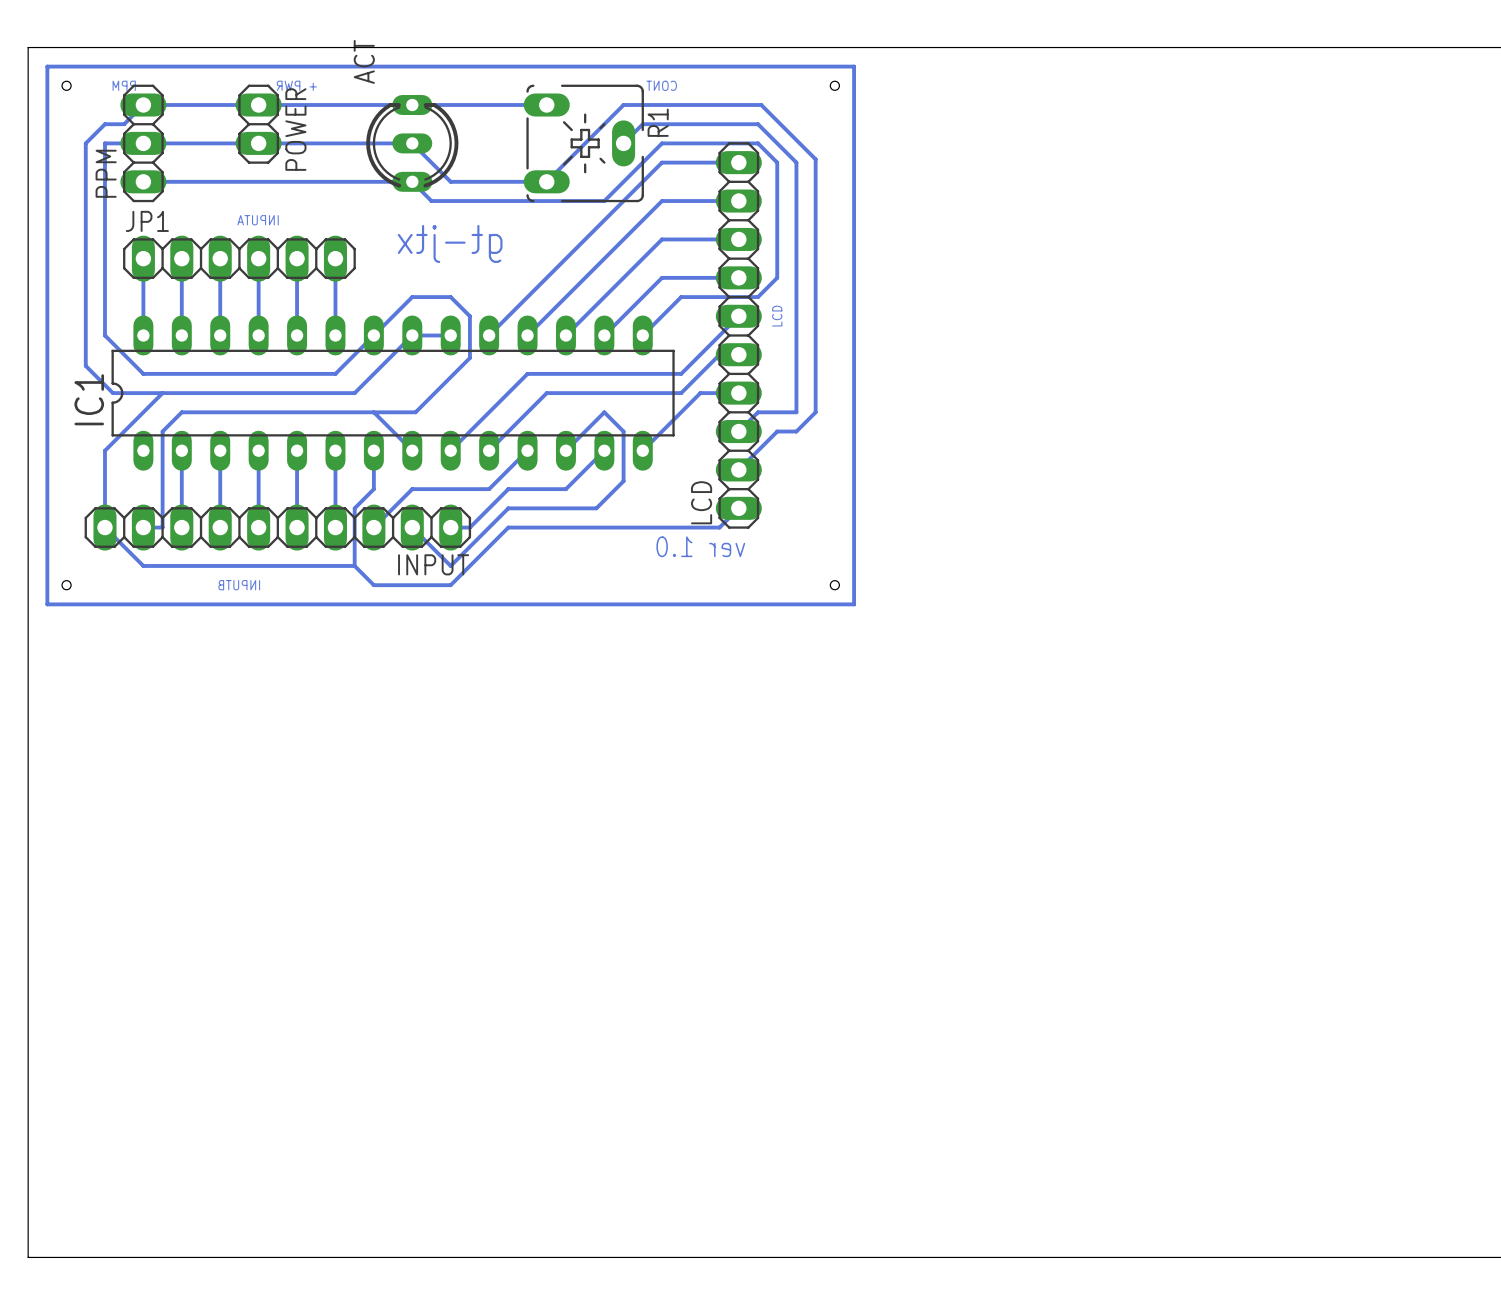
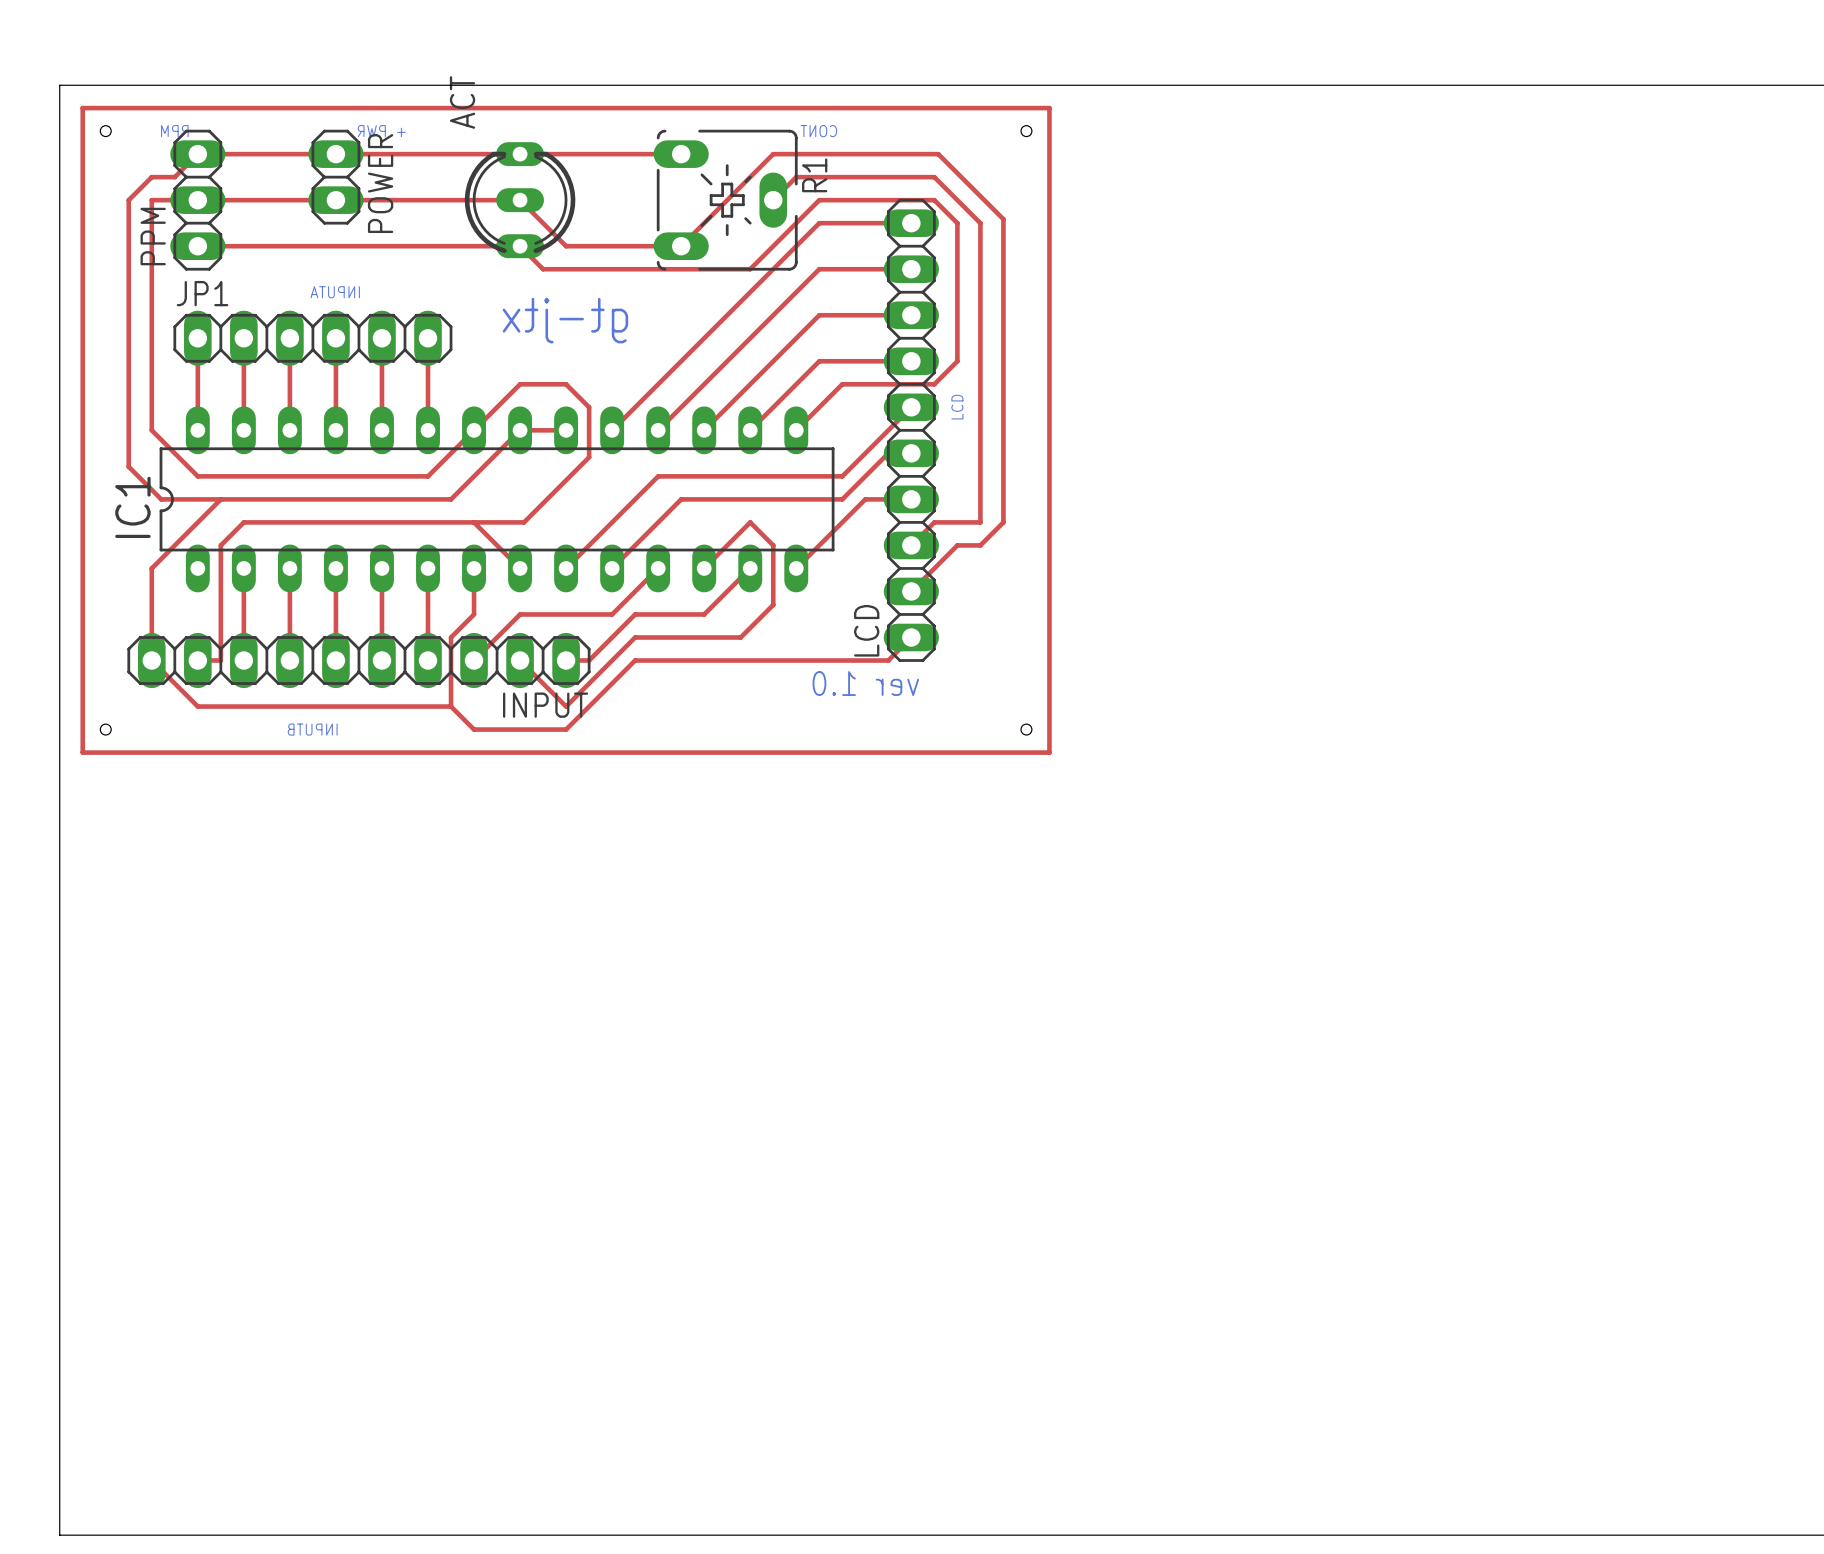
bottom track: (47, 66) (47, 604) (854, 604) (854, 66) (47, 66) -> none
top track: none -> (82, 108) (82, 752) (1049, 752) (1049, 108) (82, 108)
bottom track: (546, 105) (143, 105) (124, 124) (104, 124) (85, 143) (85, 365) (112, 393) (354, 393) (412, 335) (450, 335) -> none
top track: none -> (681, 154) (197, 154) (174, 177) (151, 177) (128, 200) (128, 466) (161, 499) (451, 499) (520, 430) (566, 430)
bottom track: (623, 143) (642, 124) (758, 124) (796, 162) (796, 412) (758, 412) (738, 431) -> none
top track: none -> (773, 200) (796, 177) (934, 177) (980, 223) (980, 522) (934, 522) (911, 545)
bottom track: (738, 162) (661, 162) (489, 335) -> none
top track: none -> (911, 223) (819, 223) (612, 430)
bottom track: (143, 181) (412, 181) (431, 201) (604, 201) (661, 143) (758, 143) (777, 162) (777, 277) (758, 297) (681, 297) (642, 335) -> none
top track: none -> (197, 246) (520, 246) (543, 269) (750, 269) (819, 200) (934, 200) (957, 223) (957, 361) (934, 384) (842, 384) (796, 430)
bottom track: (738, 201) (661, 201) (527, 335) -> none
top track: none -> (911, 269) (819, 269) (658, 430)
bottom track: (738, 239) (661, 239) (565, 335) -> none
top track: none -> (911, 315) (819, 315) (704, 430)
bottom track: (143, 258) (143, 335) -> none
top track: none -> (197, 338) (197, 430)
bottom track: (181, 258) (181, 335) -> none
top track: none -> (243, 338) (243, 430)
bottom track: (220, 258) (220, 335) -> none
top track: none -> (289, 338) (289, 430)
bottom track: (258, 258) (258, 335) -> none
top track: none -> (335, 338) (335, 430)
bottom track: (297, 258) (297, 335) -> none
top track: none -> (381, 338) (381, 430)
bottom track: (335, 258) (335, 335) -> none
top track: none -> (428, 338) (428, 430)
bottom track: (738, 277) (661, 277) (604, 335) -> none
top track: none -> (911, 361) (819, 361) (750, 430)
bottom track: (738, 316) (681, 373) (527, 373) (450, 450) -> none
top track: none -> (911, 407) (842, 476) (658, 476) (566, 568)
bottom track: (738, 354) (719, 354) (681, 393) (546, 393) (489, 450) -> none
top track: none -> (911, 453) (888, 453) (842, 499) (681, 499) (612, 568)
bottom track: (162, 393) (104, 450) (104, 527) (143, 565) (354, 565) -> none
top track: none -> (220, 499) (151, 568) (151, 660) (197, 706) (451, 706)
bottom track: (738, 393) (700, 393) (642, 450) -> none
top track: none -> (911, 499) (865, 499) (796, 568)
bottom track: (373, 412) (412, 450) -> none
top track: none -> (474, 522) (520, 568)
bottom track: (181, 450) (181, 527) -> none
top track: none -> (243, 568) (243, 660)
bottom track: (220, 450) (220, 527) -> none
top track: none -> (289, 568) (289, 660)
bottom track: (258, 450) (258, 527) -> none
top track: none -> (335, 568) (335, 660)
bottom track: (297, 450) (297, 527) -> none
top track: none -> (381, 568) (381, 660)
bottom track: (335, 450) (335, 527) -> none
top track: none -> (428, 568) (428, 660)
bottom track: (373, 450) (373, 489) (354, 508) (354, 565) -> none
top track: none -> (474, 568) (474, 614) (451, 637) (451, 706)
bottom track: (527, 450) (489, 489) (412, 489) (373, 527) -> none
top track: none -> (658, 568) (612, 614) (520, 614) (474, 660)
bottom track: (565, 450) (604, 412) (623, 431) (623, 481) (596, 508) (508, 508) (450, 565) (412, 527) -> none
top track: none -> (704, 568) (750, 522) (773, 545) (773, 604) (740, 637) (635, 637) (566, 706) (520, 660)
bottom track: (604, 450) (565, 489) (508, 489) (469, 527) (450, 527) -> none
top track: none -> (750, 568) (704, 614) (635, 614) (589, 660) (566, 660)
bottom track: (738, 469) (777, 431) (796, 431) (815, 412) (815, 159) (761, 105) (623, 105) (546, 181) (450, 181) (412, 143) (104, 143) (104, 335) (143, 373) (335, 373) (412, 297) (450, 297) (469, 316) (469, 357) (415, 412) (181, 412) (162, 431) (162, 527) (143, 527) -> none
top track: none -> (911, 591) (957, 545) (980, 545) (1003, 522) (1003, 219) (938, 154) (773, 154) (681, 246) (566, 246) (520, 200) (151, 200) (151, 430) (197, 476) (428, 476) (520, 384) (566, 384) (589, 407) (589, 457) (524, 522) (243, 522) (220, 545) (220, 660) (197, 660)
bottom track: (738, 508) (719, 527) (508, 527) (450, 585) (373, 585) (354, 565) -> none
top track: none -> (911, 637) (888, 660) (635, 660) (566, 729) (474, 729) (451, 706)

